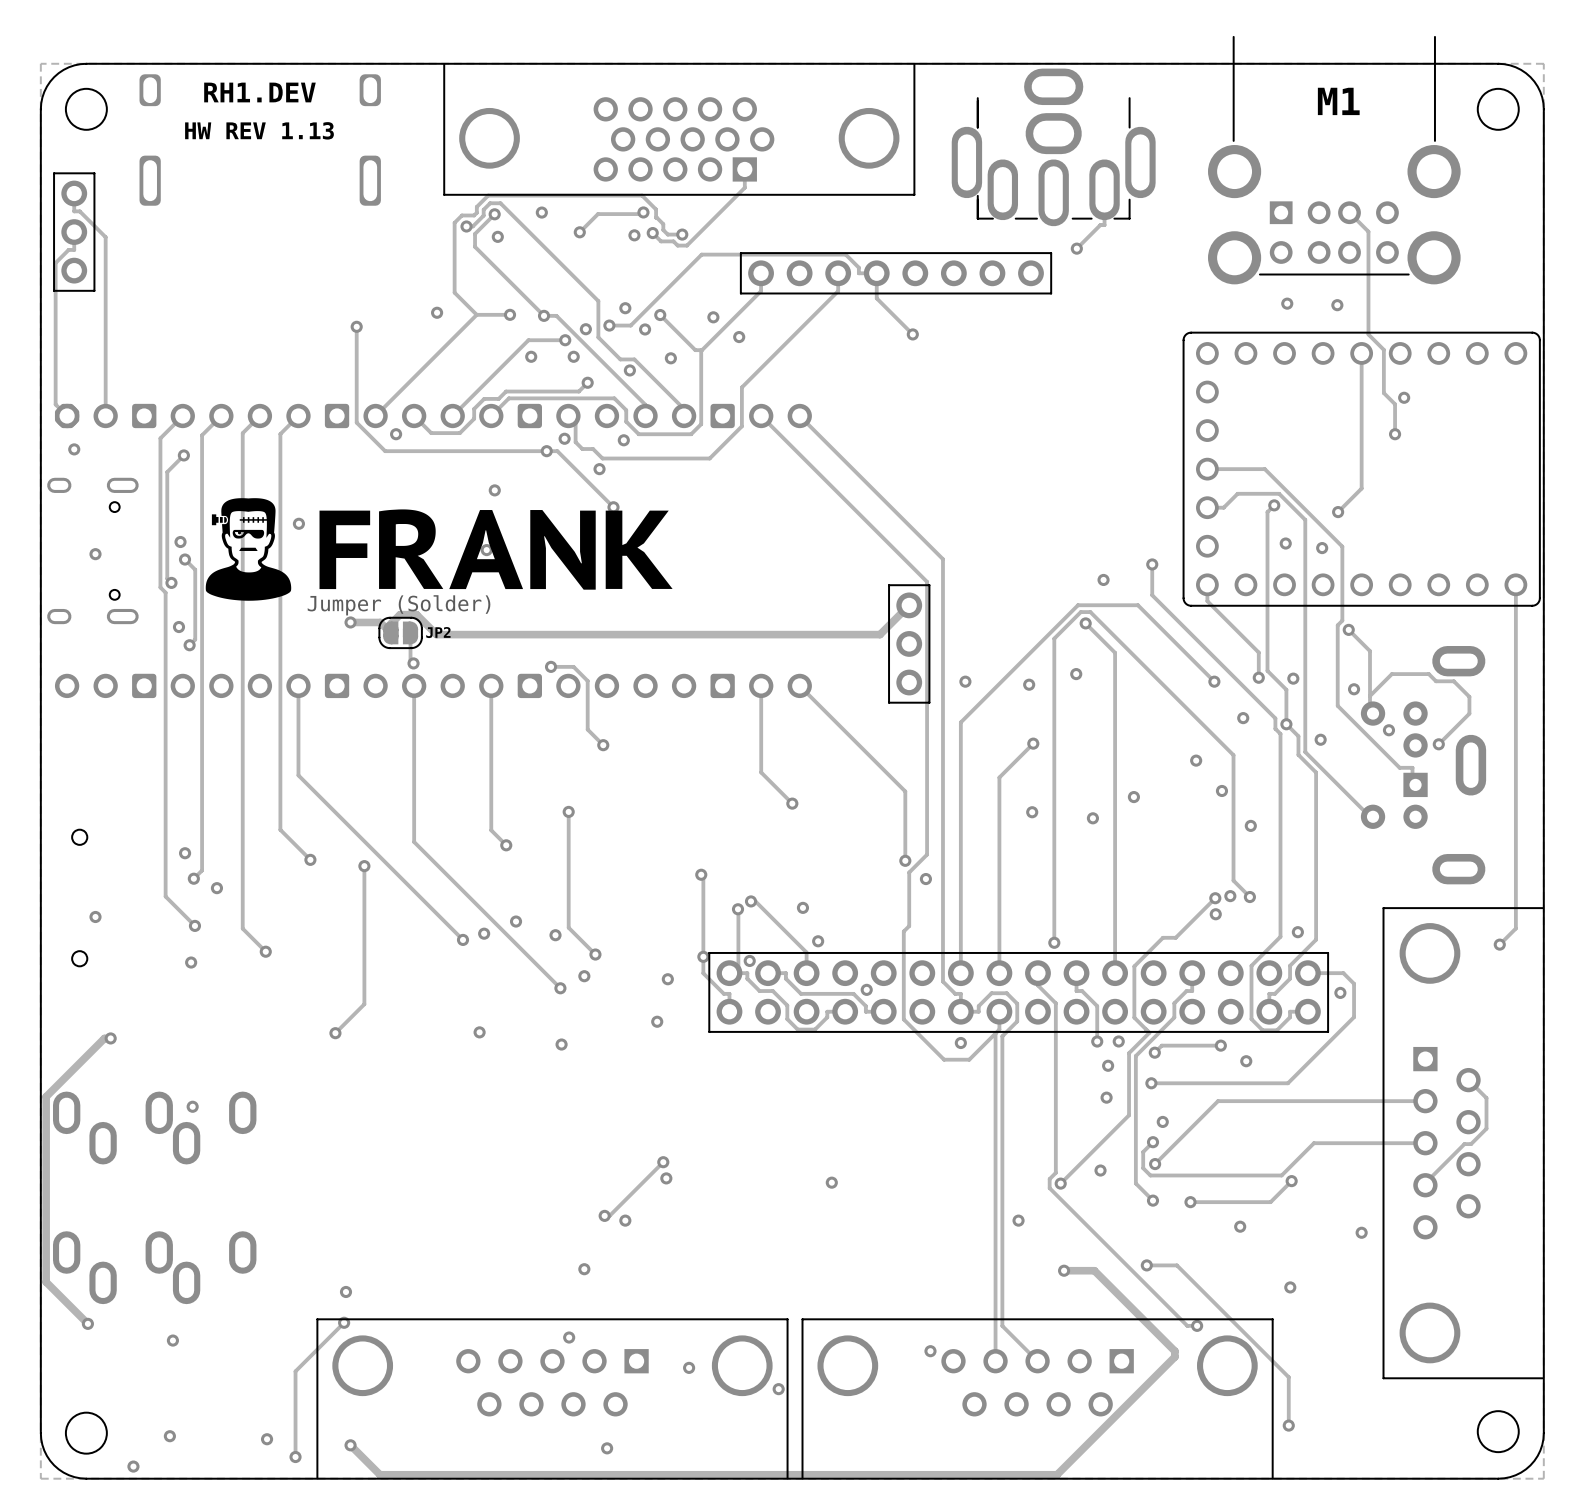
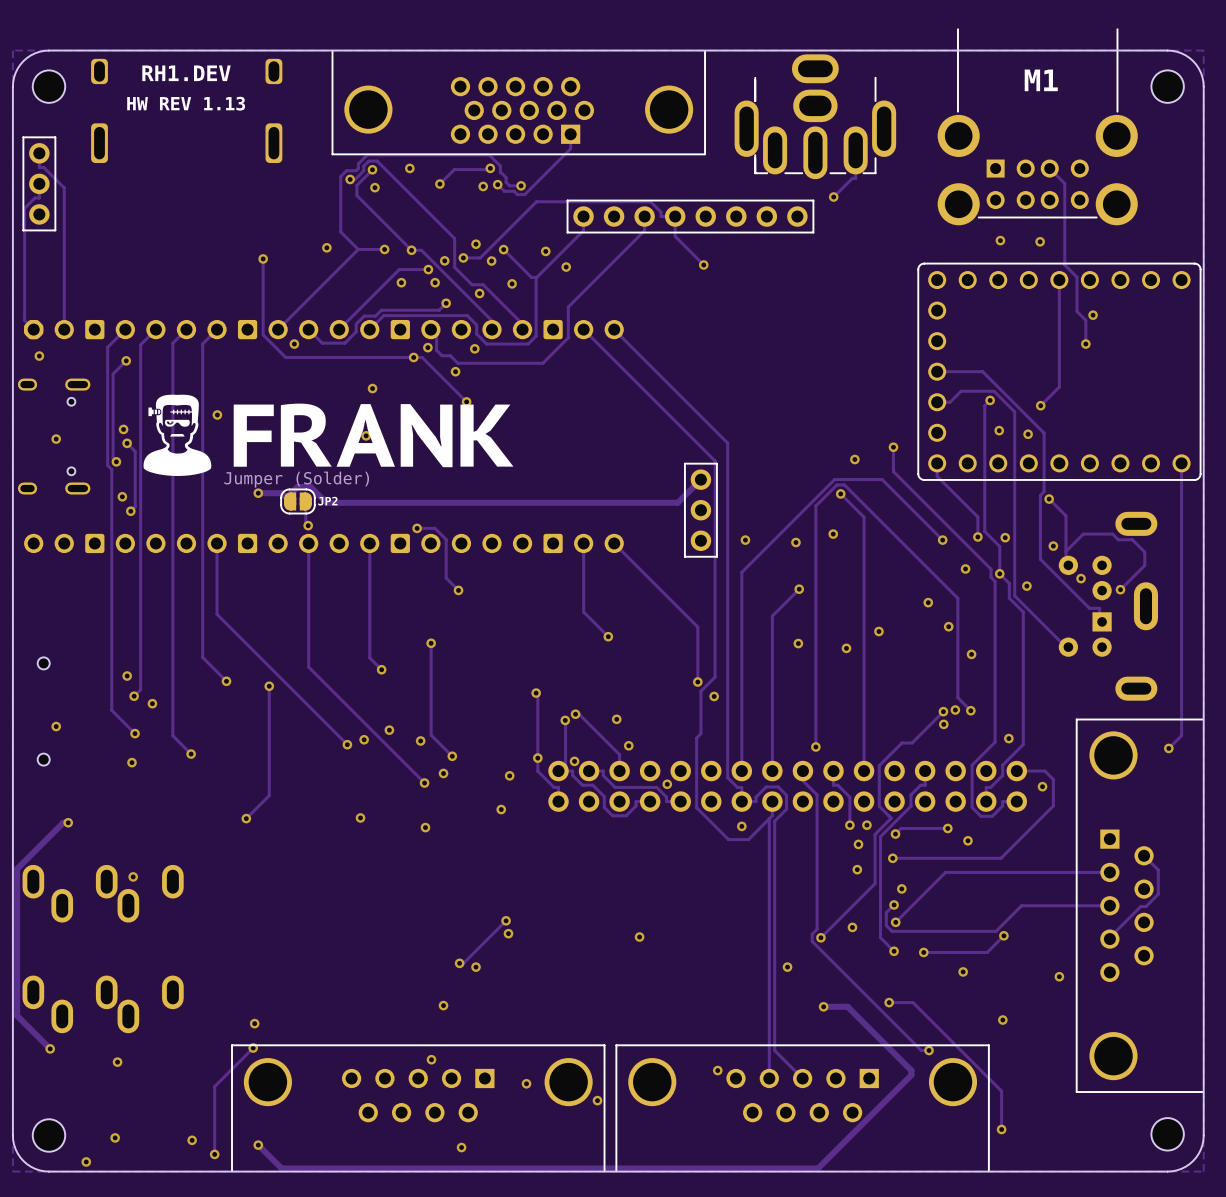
part footprint: [708, 952, 1330, 1033] -> [548, 760, 1028, 812]

